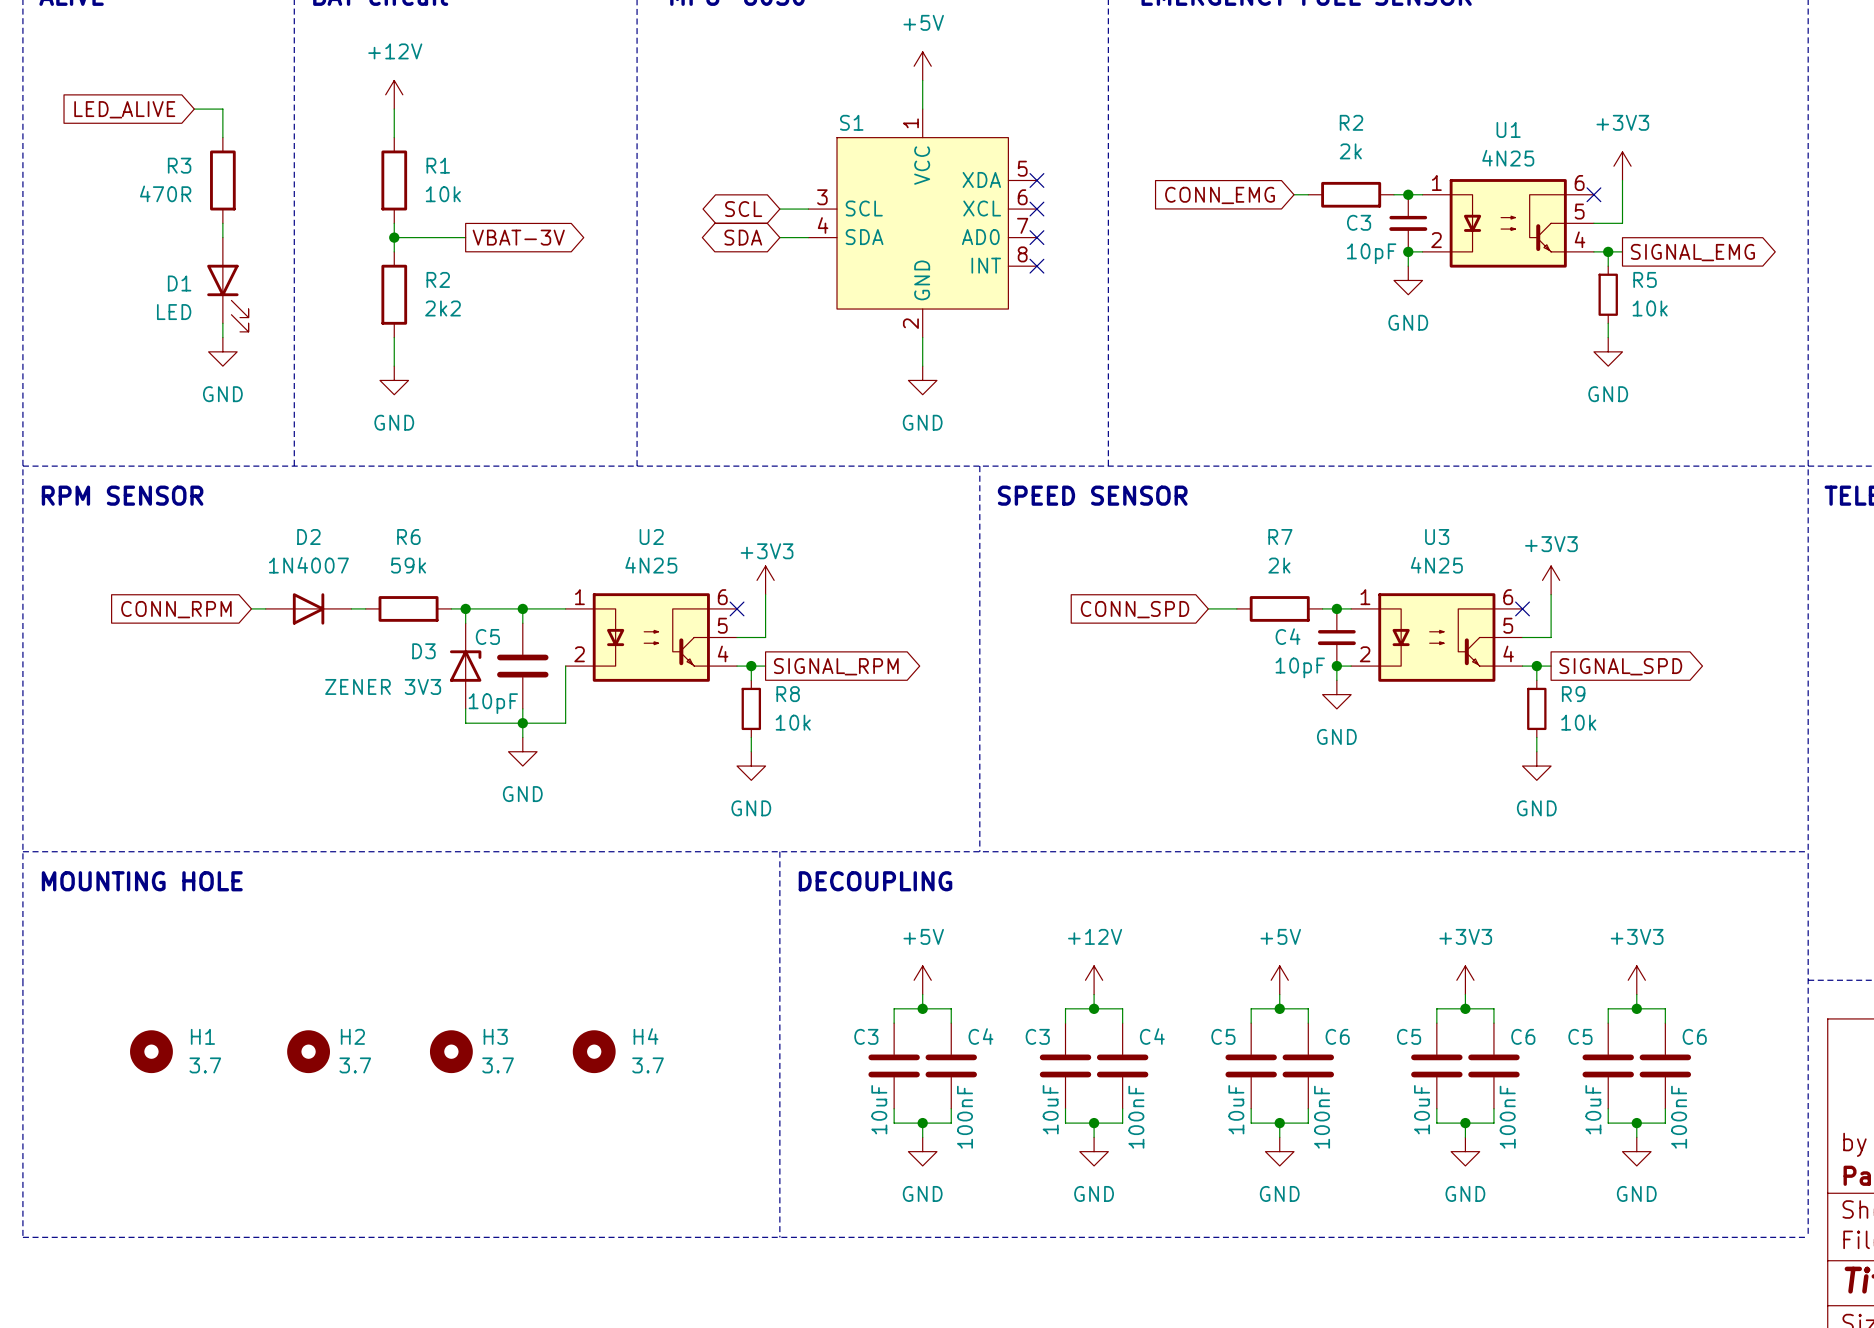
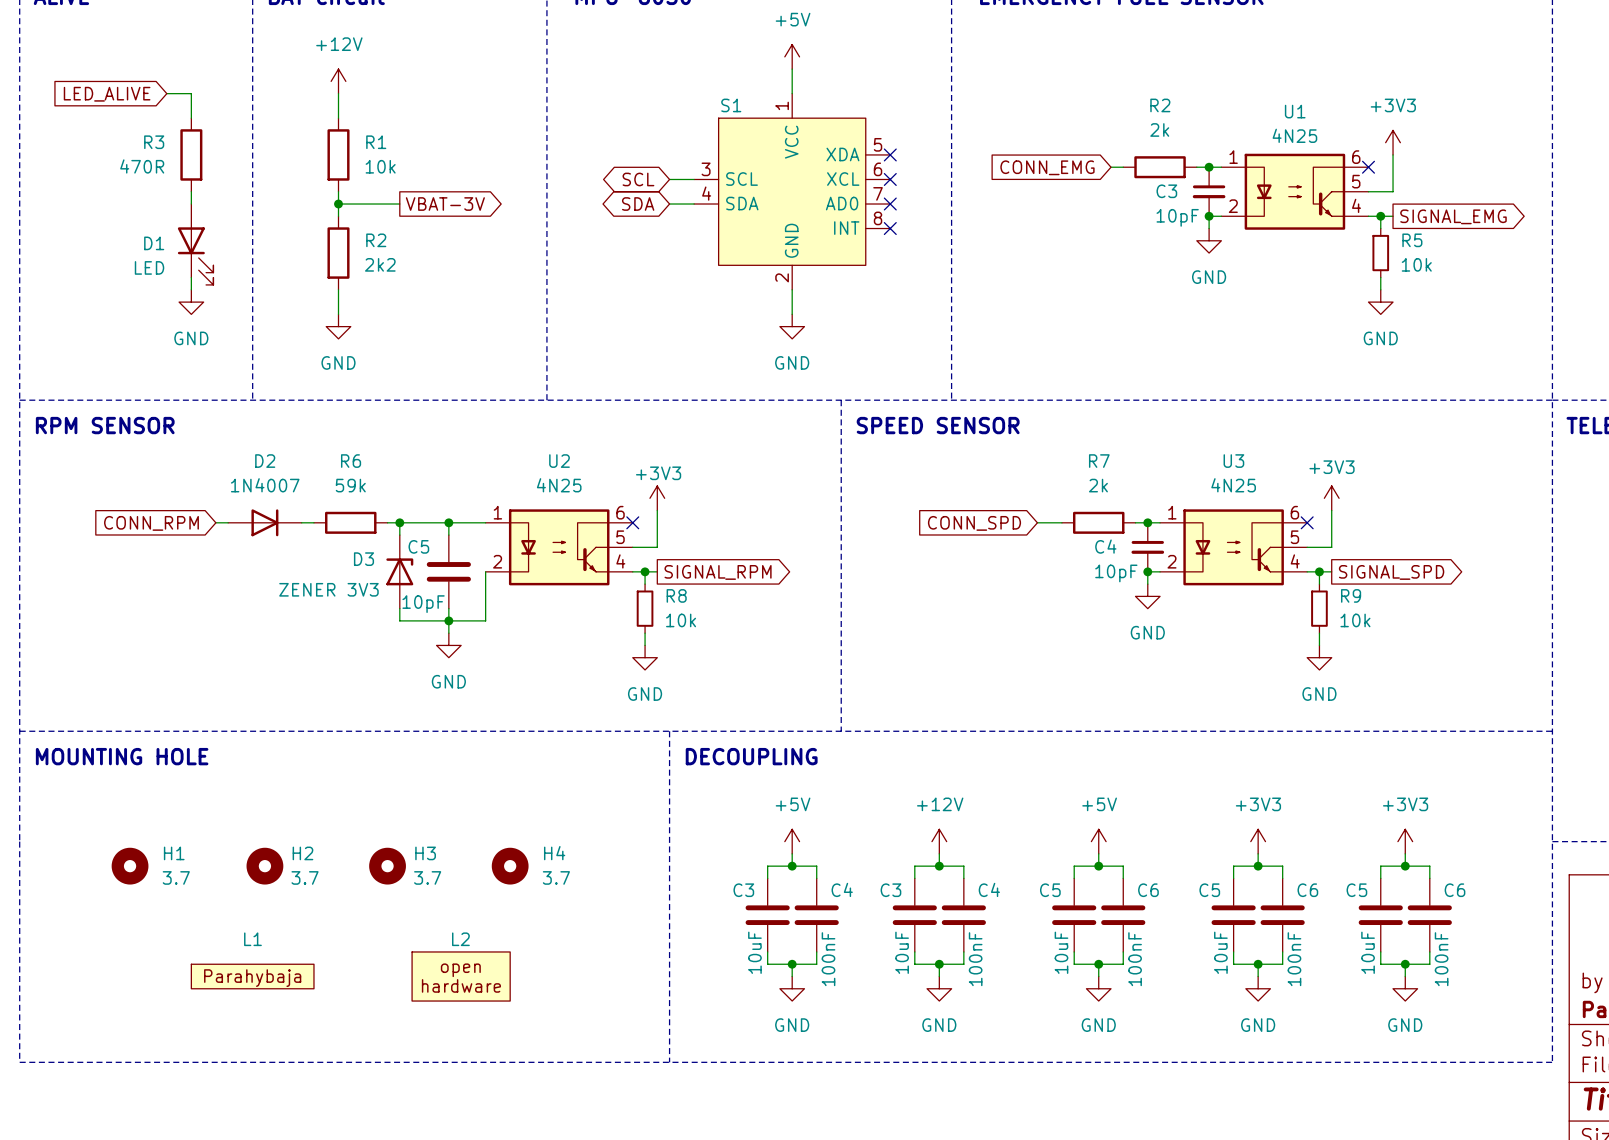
H1 position: (151, 1051) -> (130, 866)
H2 position: (308, 1051) -> (264, 866)
H3 position: (451, 1051) -> (387, 866)
H4 position: (594, 1051) -> (510, 866)
L1: none -> (252, 976)
L2: none -> (461, 976)

